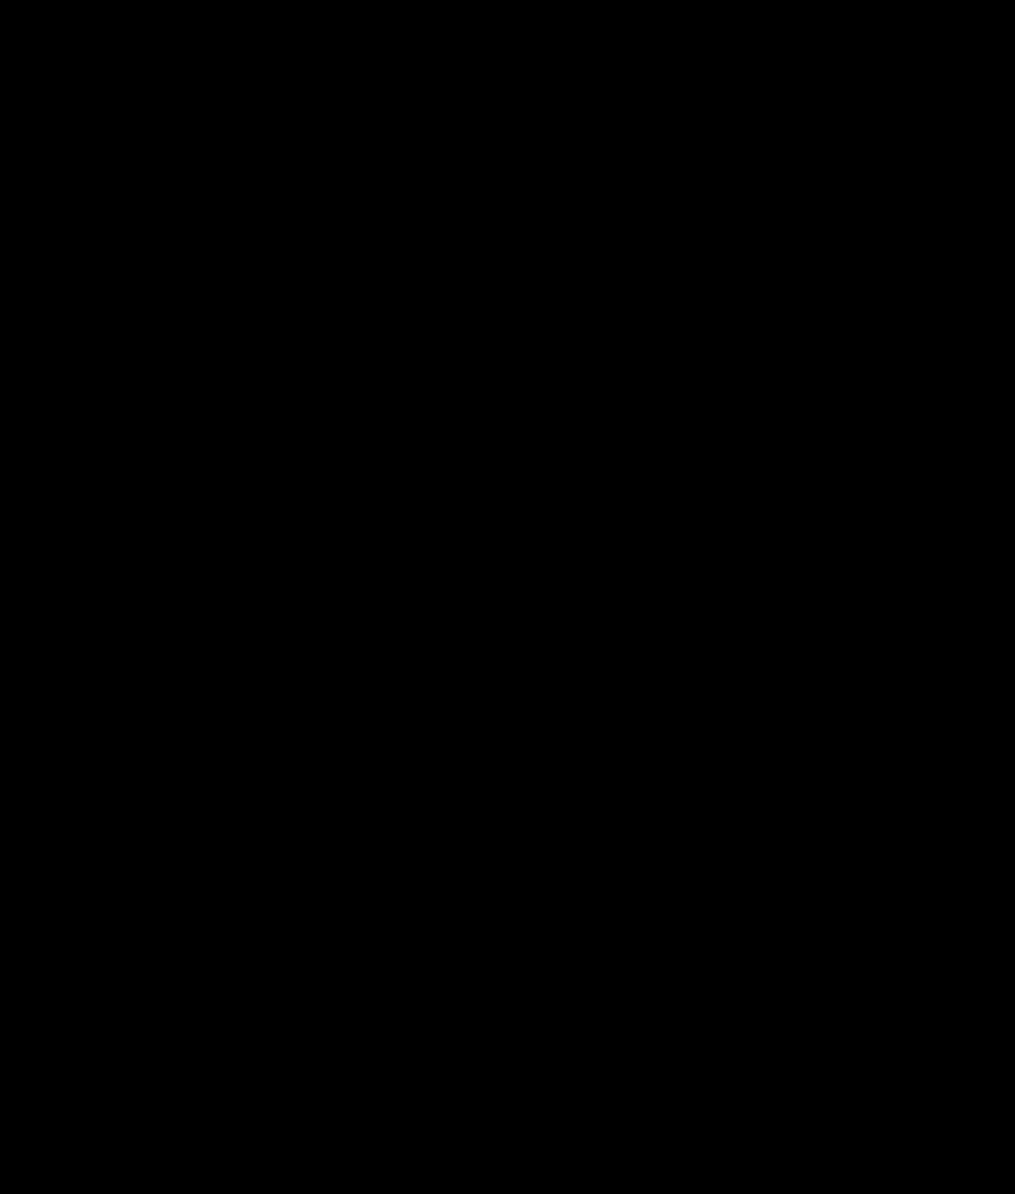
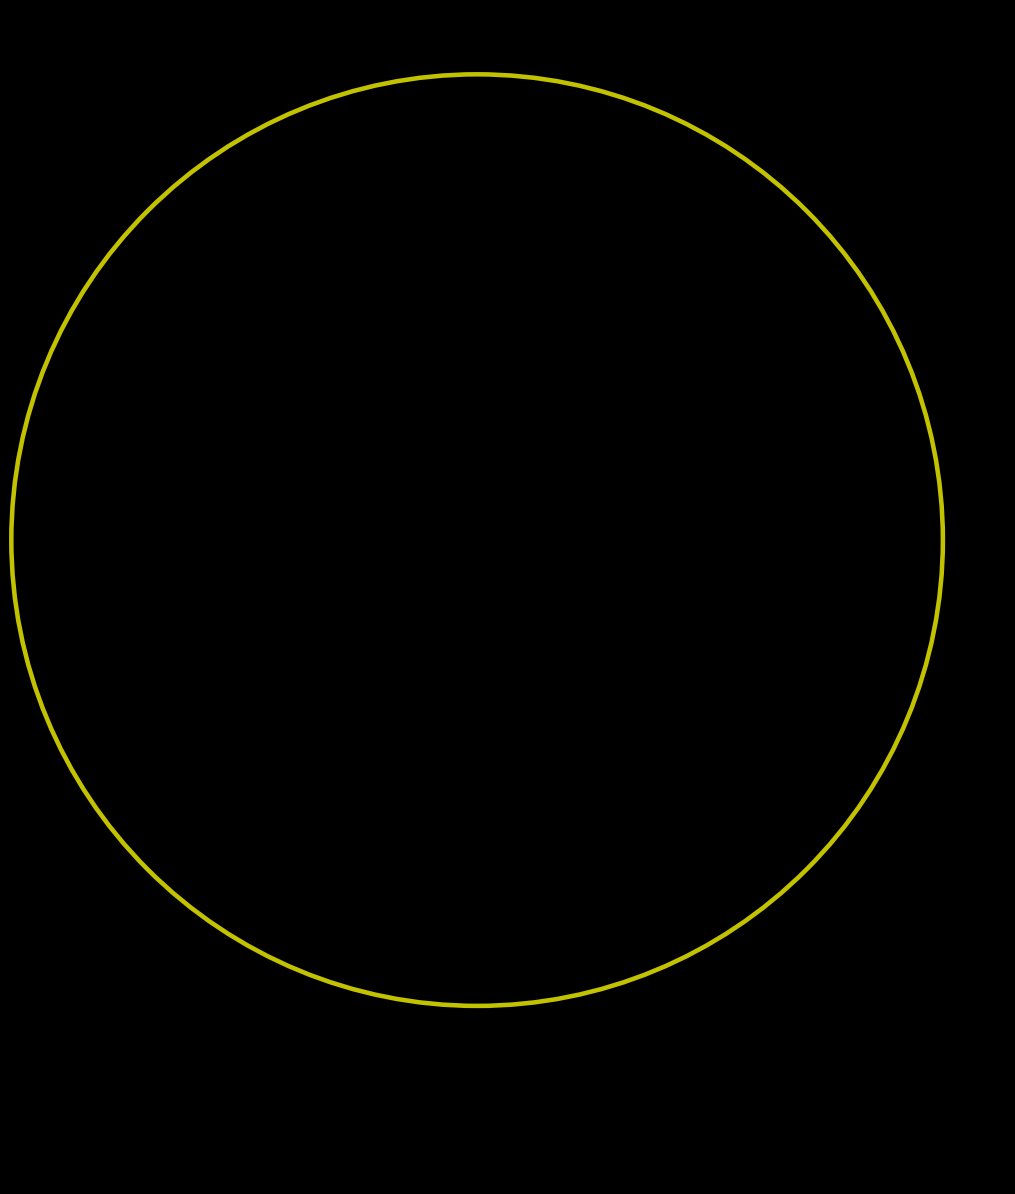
round board edge: none -> [9, 72, 946, 1009]

